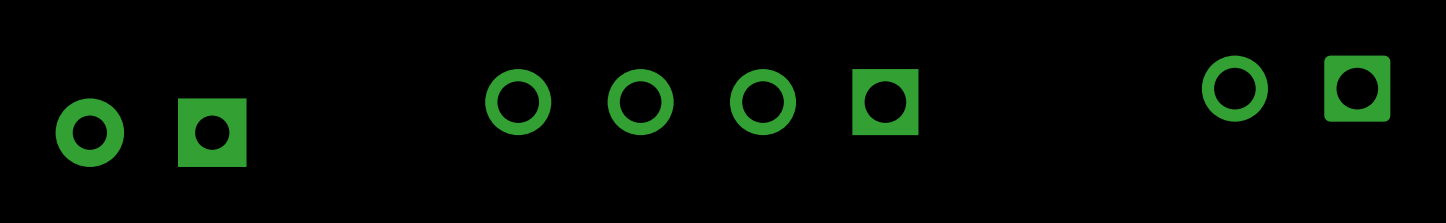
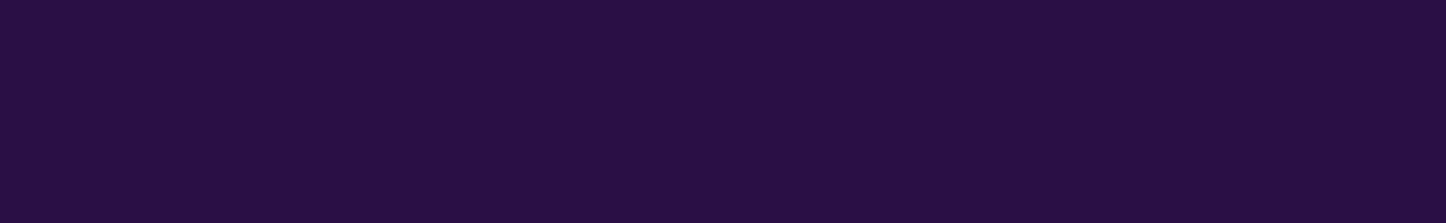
part: (1296, 88) -> none
part: (701, 102) -> none
part: (151, 132) -> none

